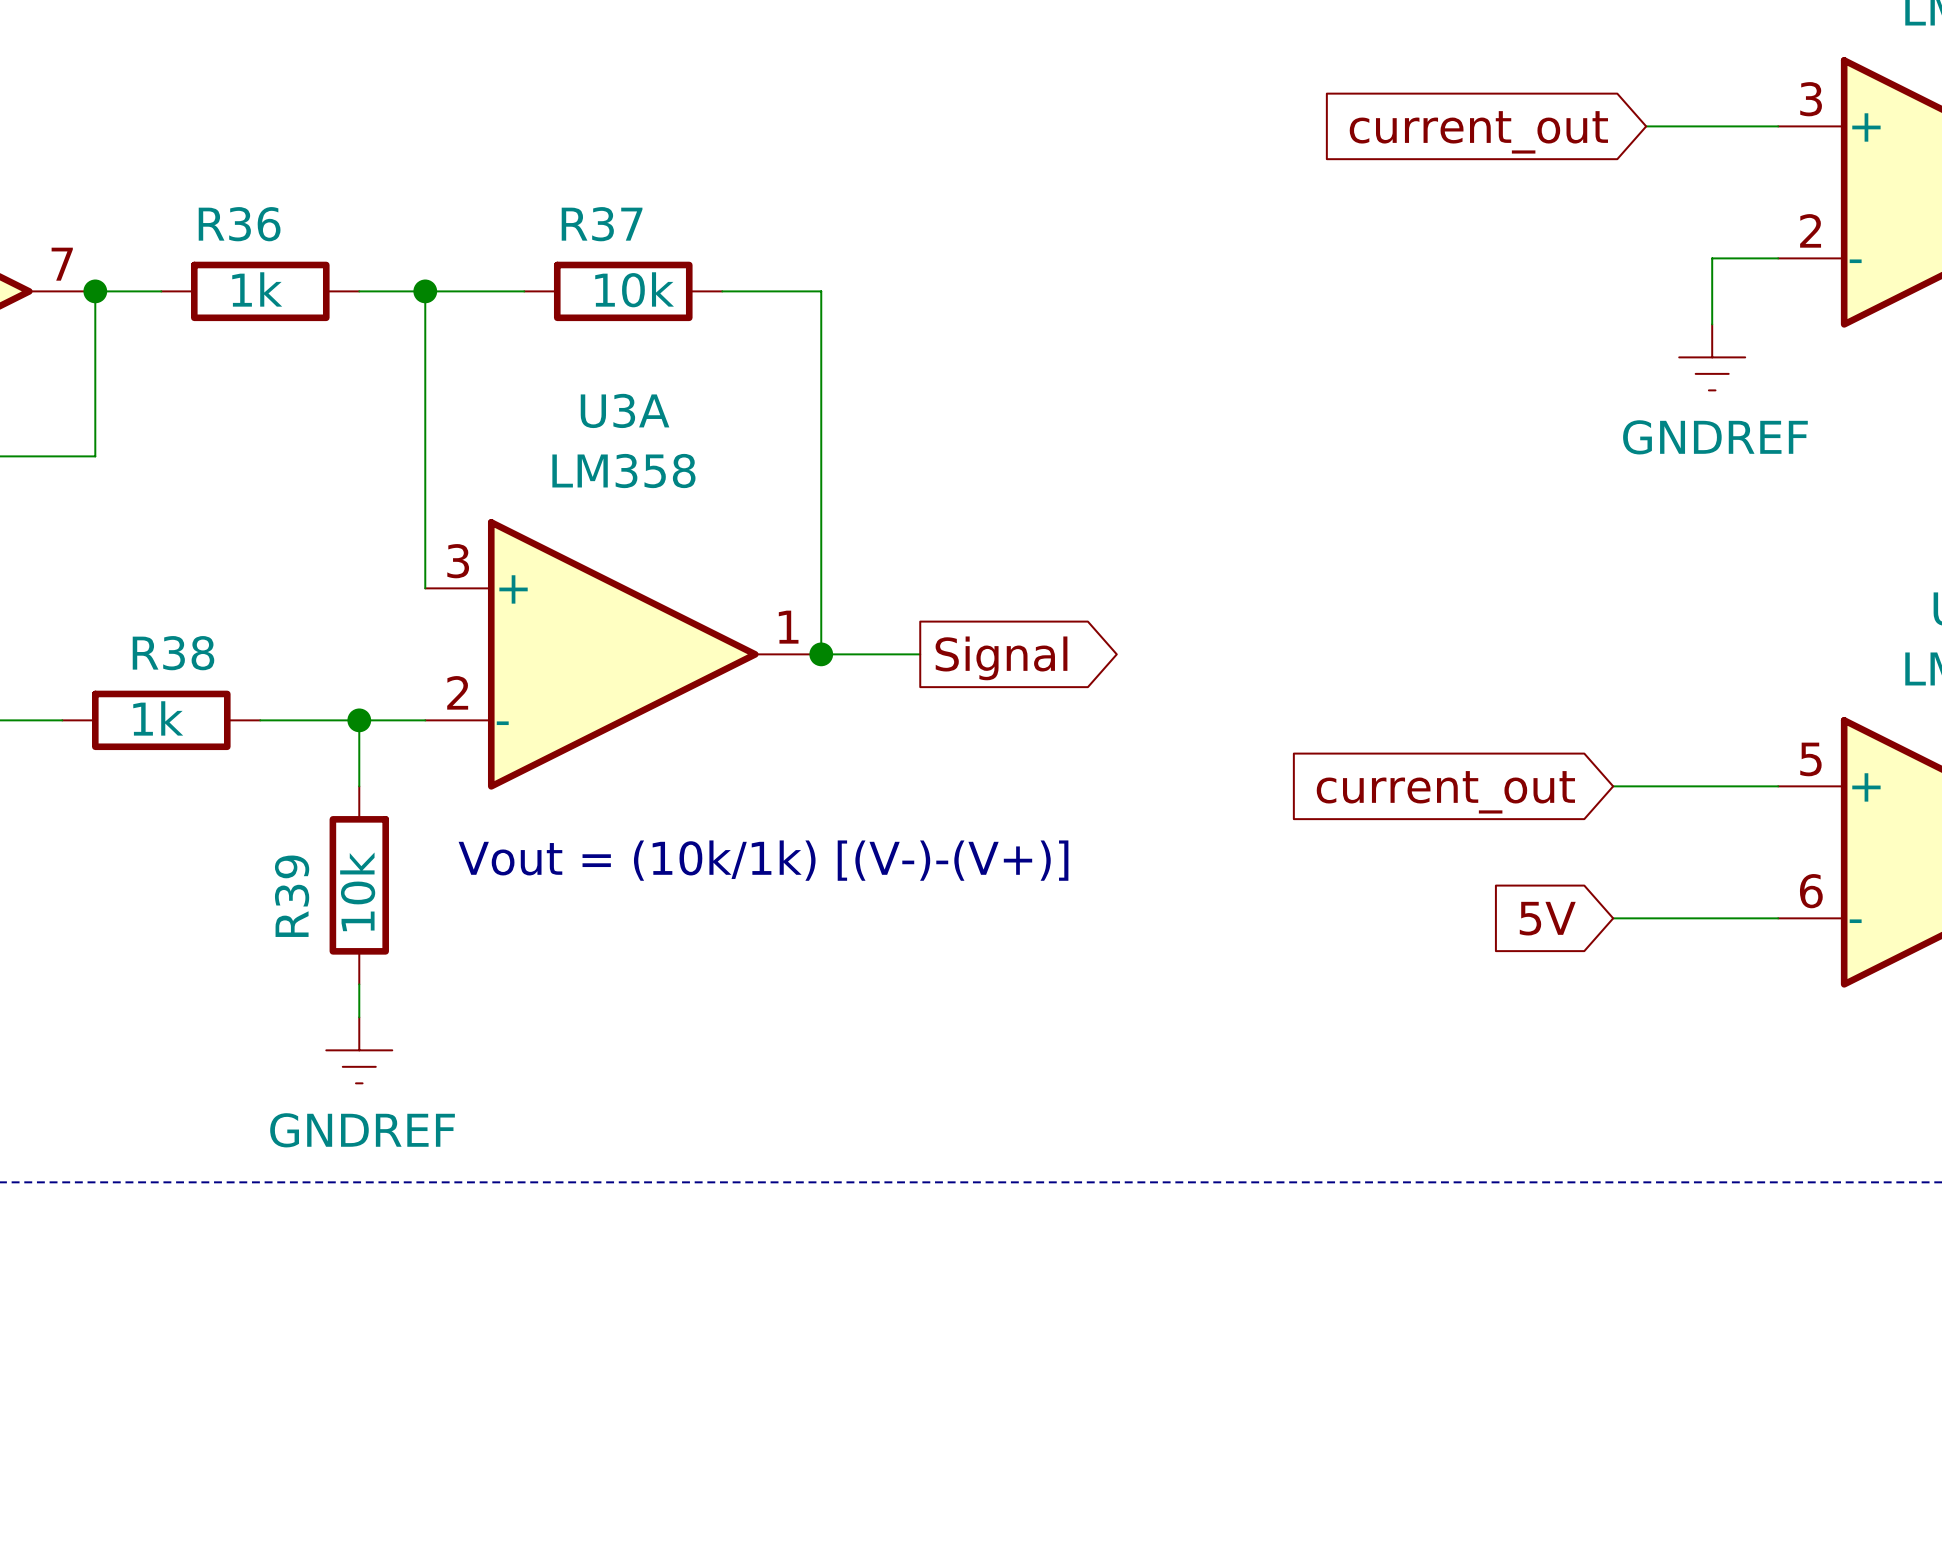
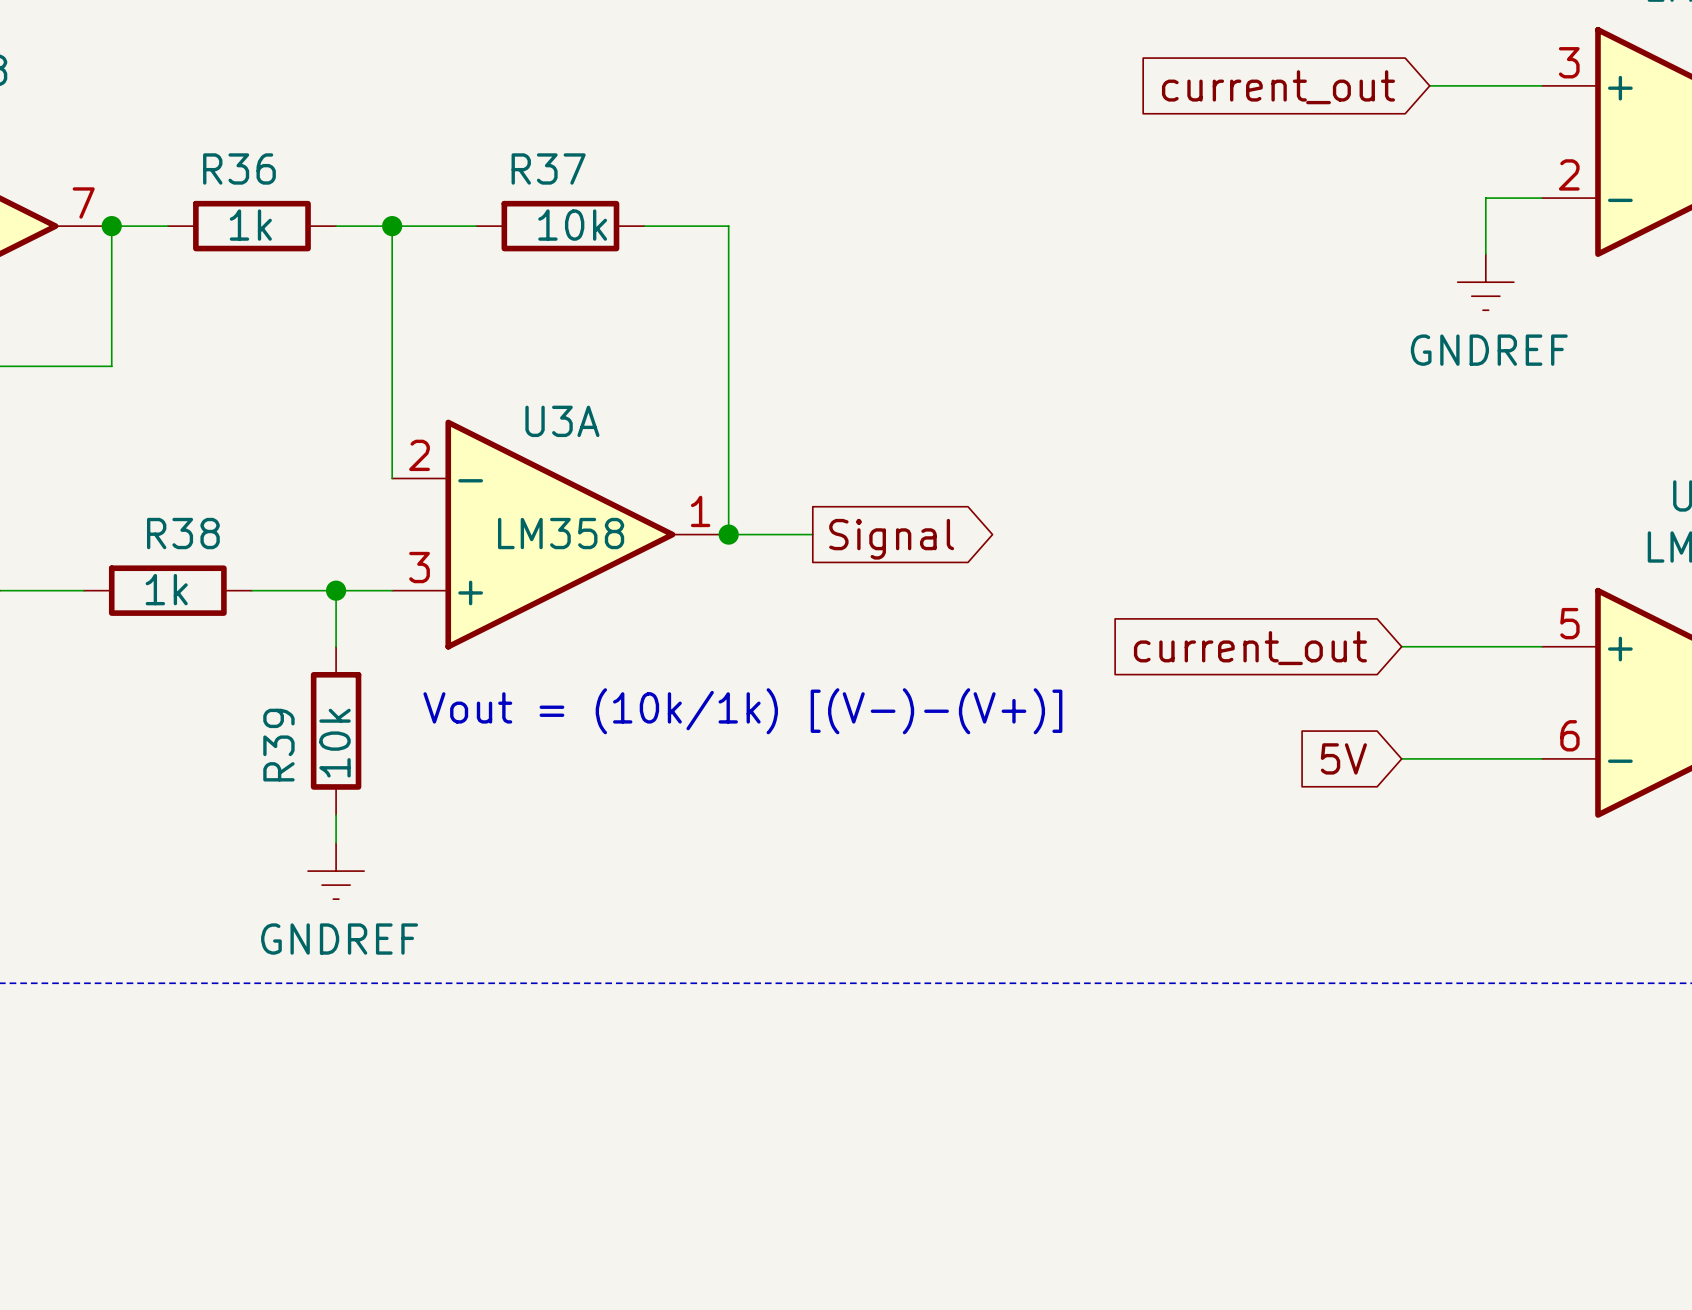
U3A name position: U3A (625, 410) -> U3A (562, 421)
U3A value position: LM358 (623, 471) -> LM358 (561, 533)
U3A flip: as is (623, 654) -> up-down (560, 534)

